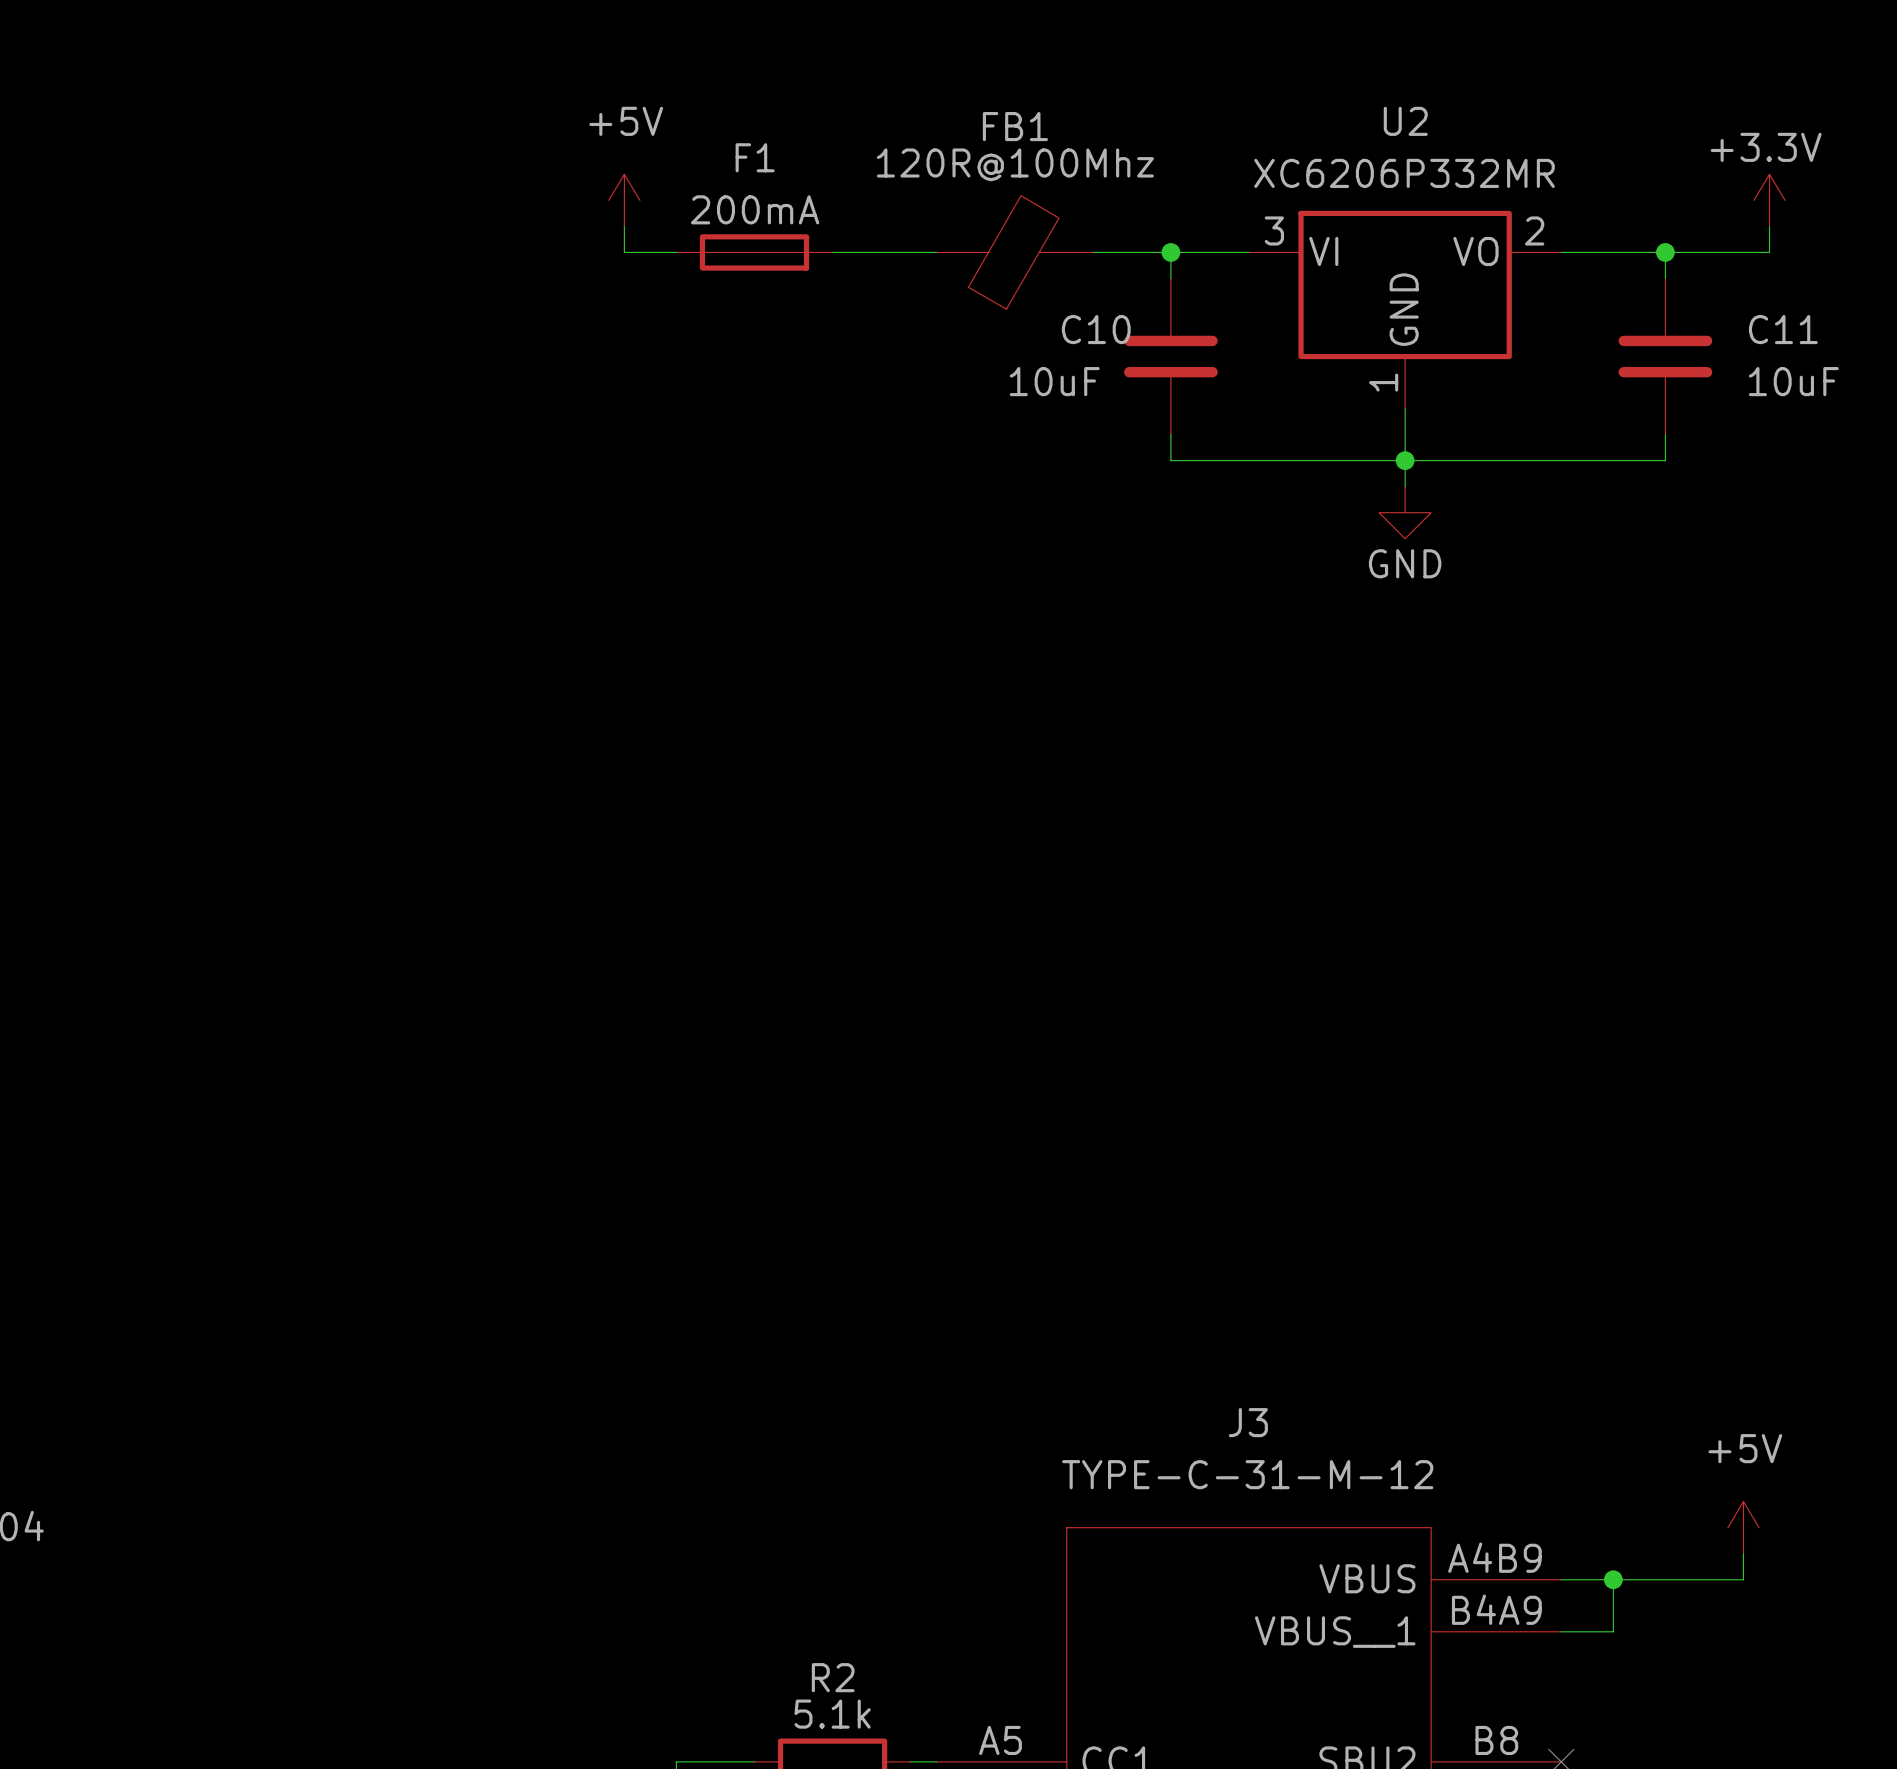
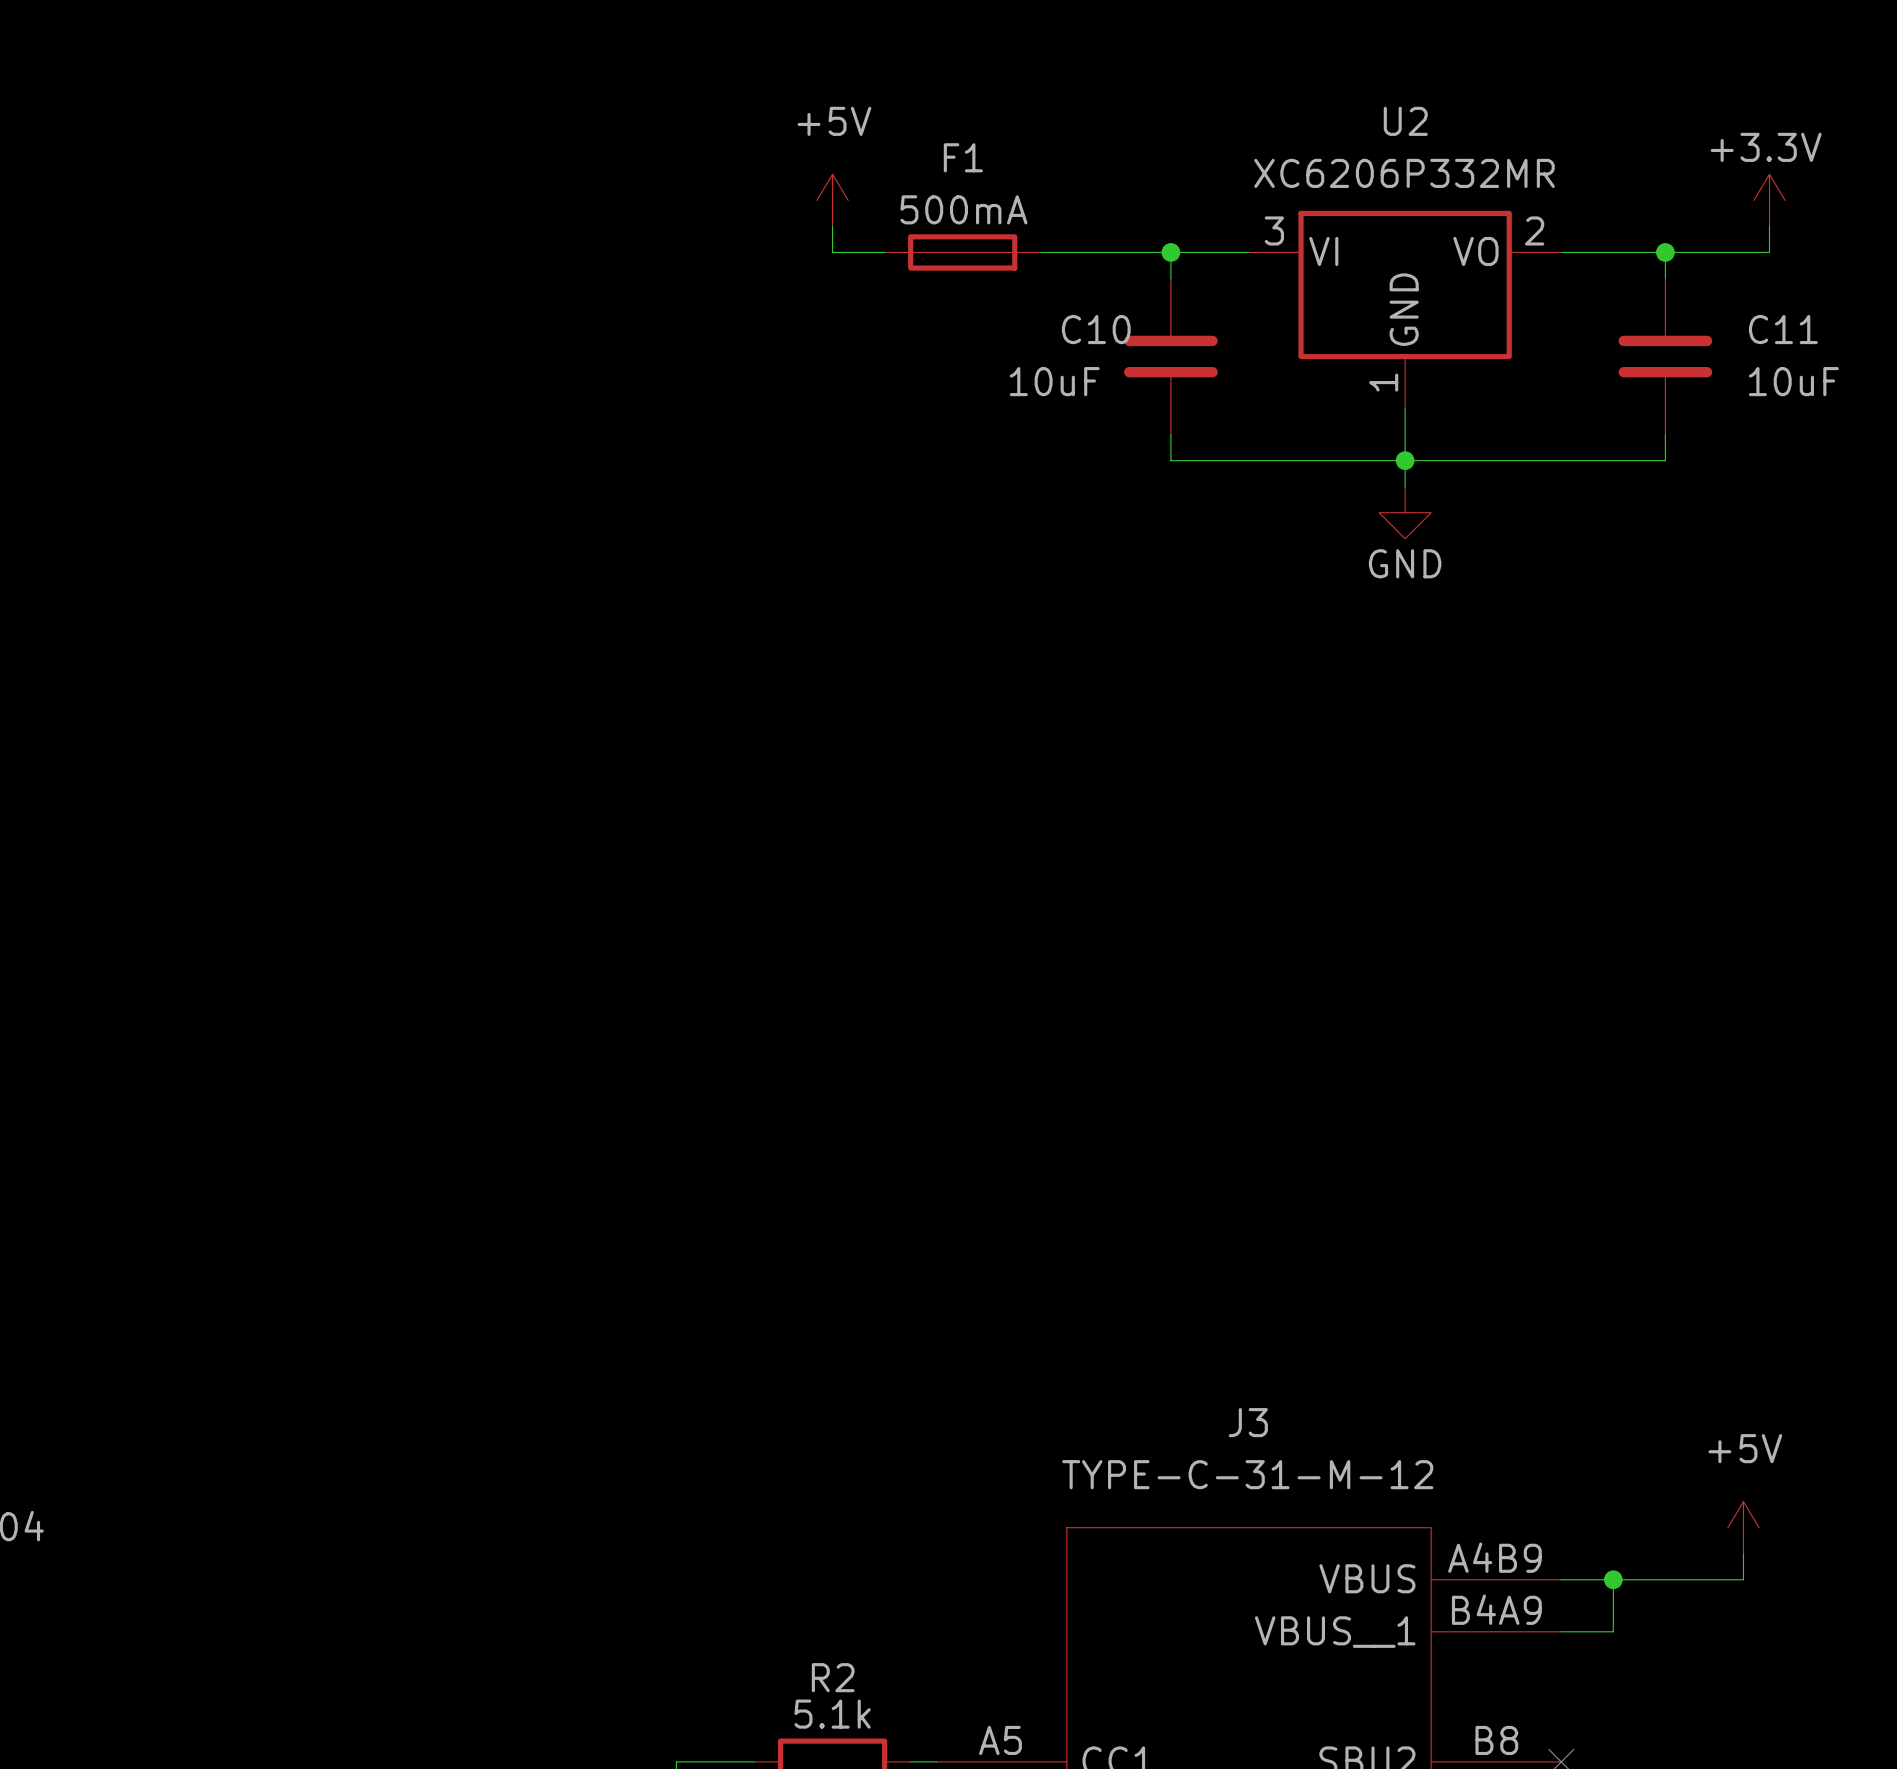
power symbol position: +5V (624, 200) -> +5V (832, 200)
F1 value: 200mA (755, 209) -> 500mA (963, 209)
wire: (624, 226) (624, 252) (676, 252) -> none
wire: none -> (832, 226) (832, 252)
F1 position: (754, 252) -> (962, 252)
FB1: 120R@100Mhz (1014, 252) -> none

